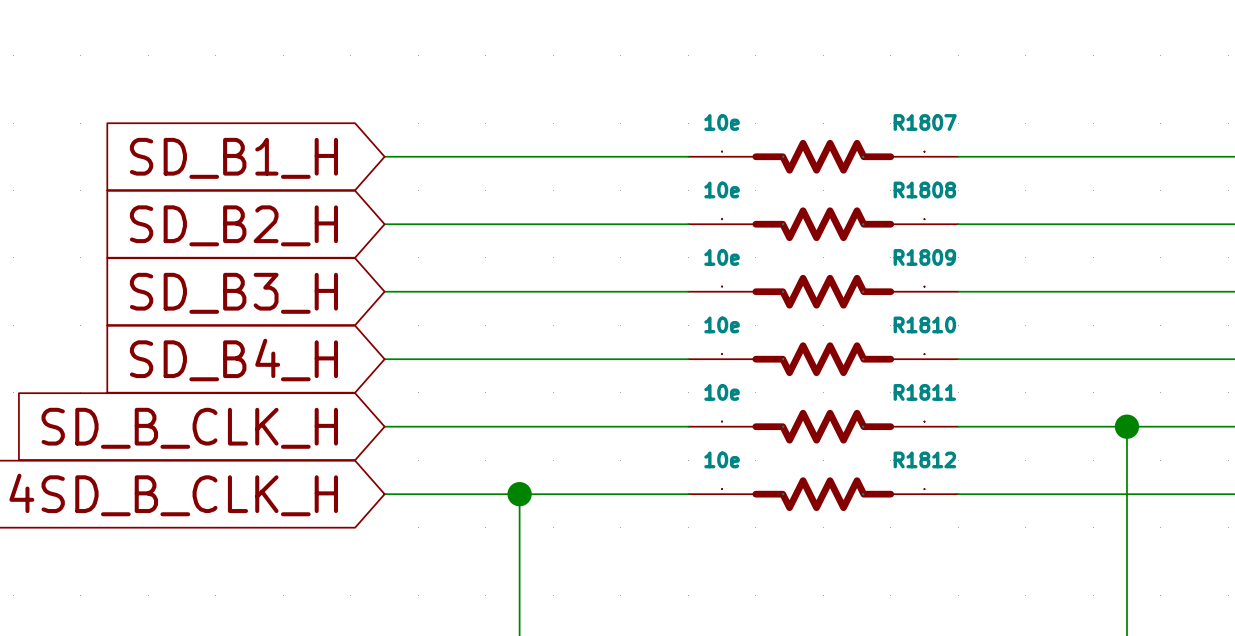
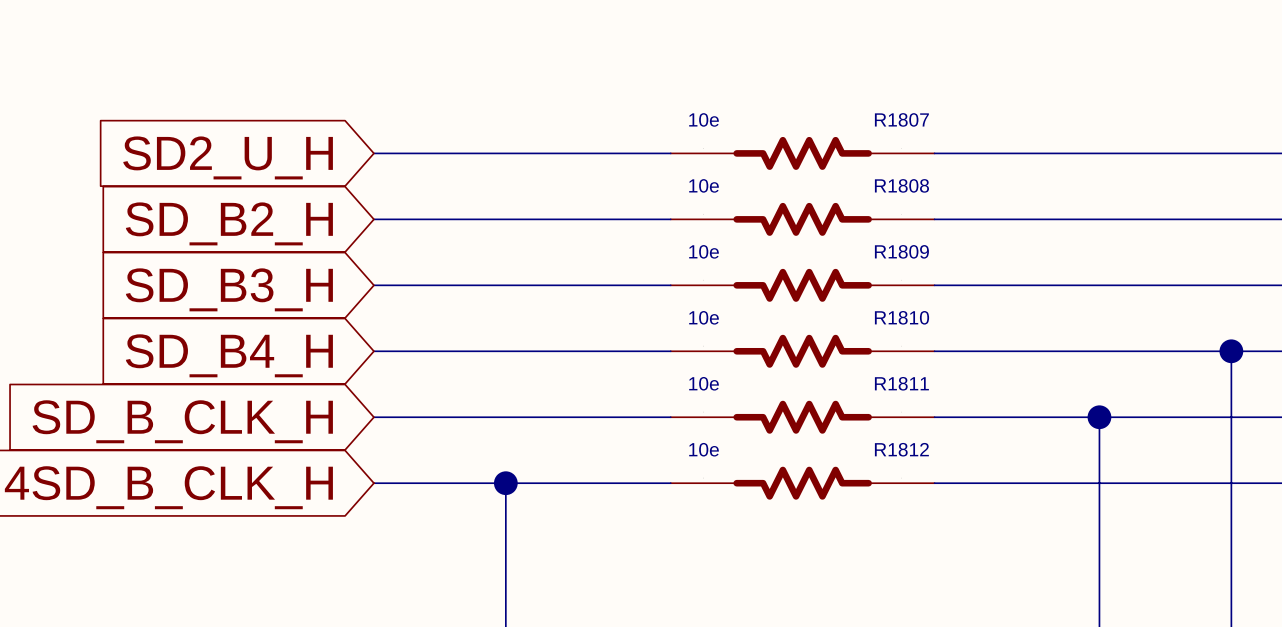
global label: SD_B1_H (233, 158) -> SD2_U_H (228, 157)

